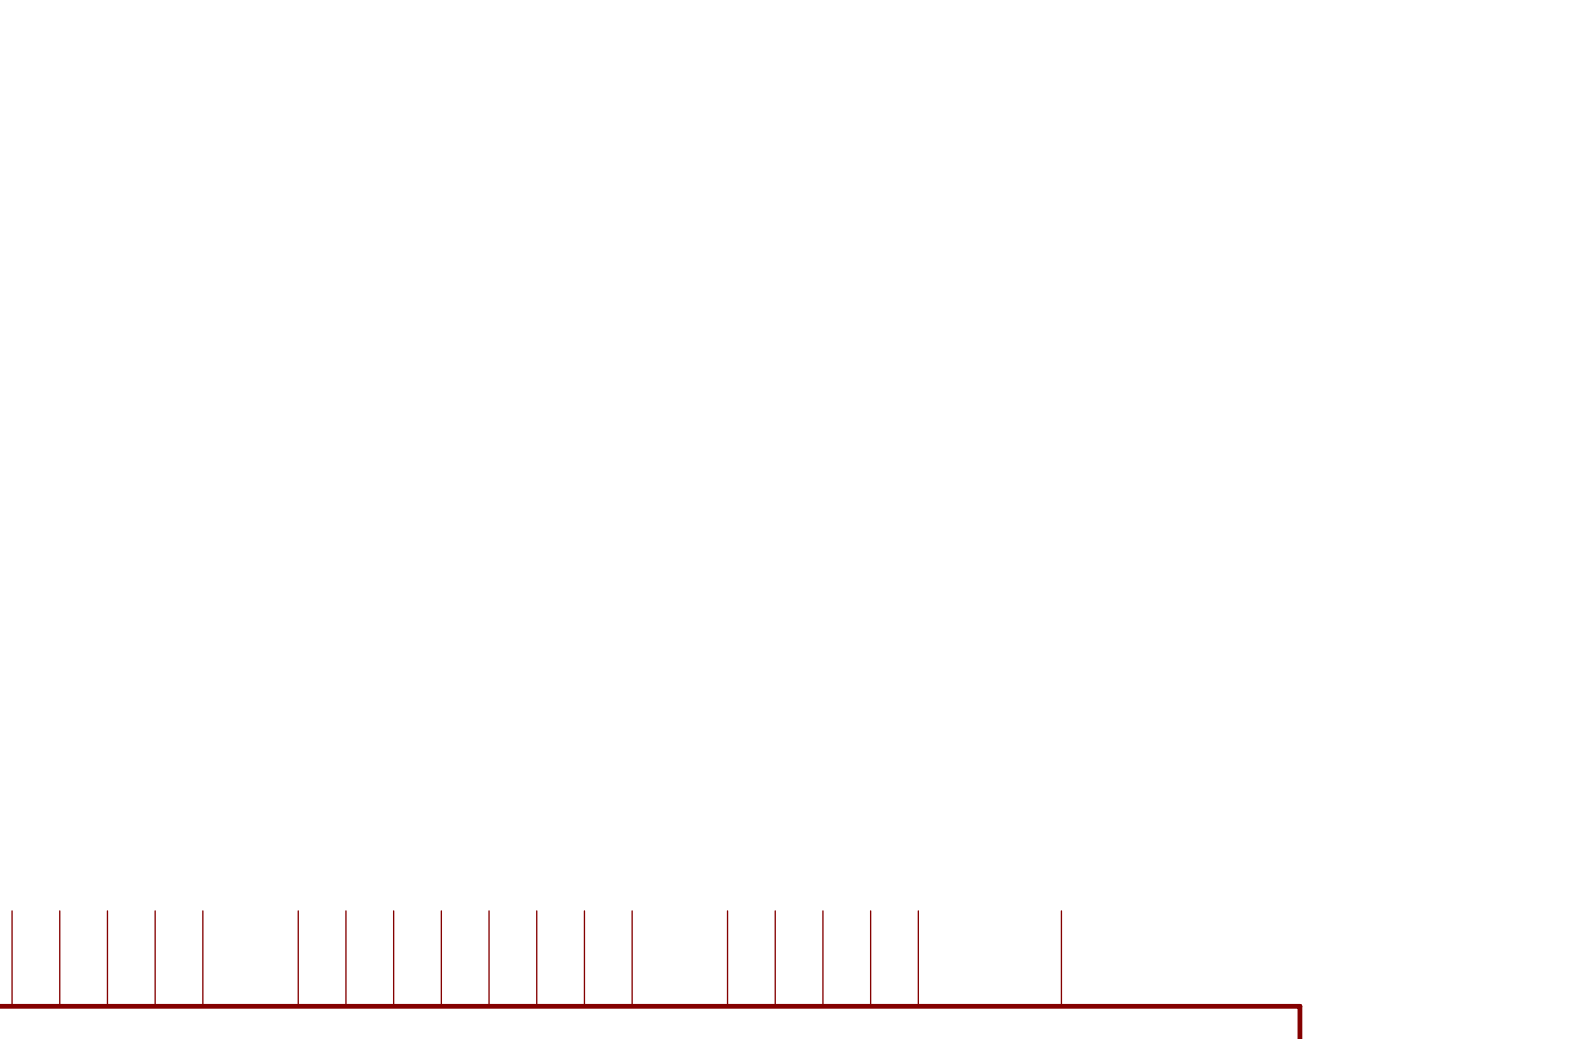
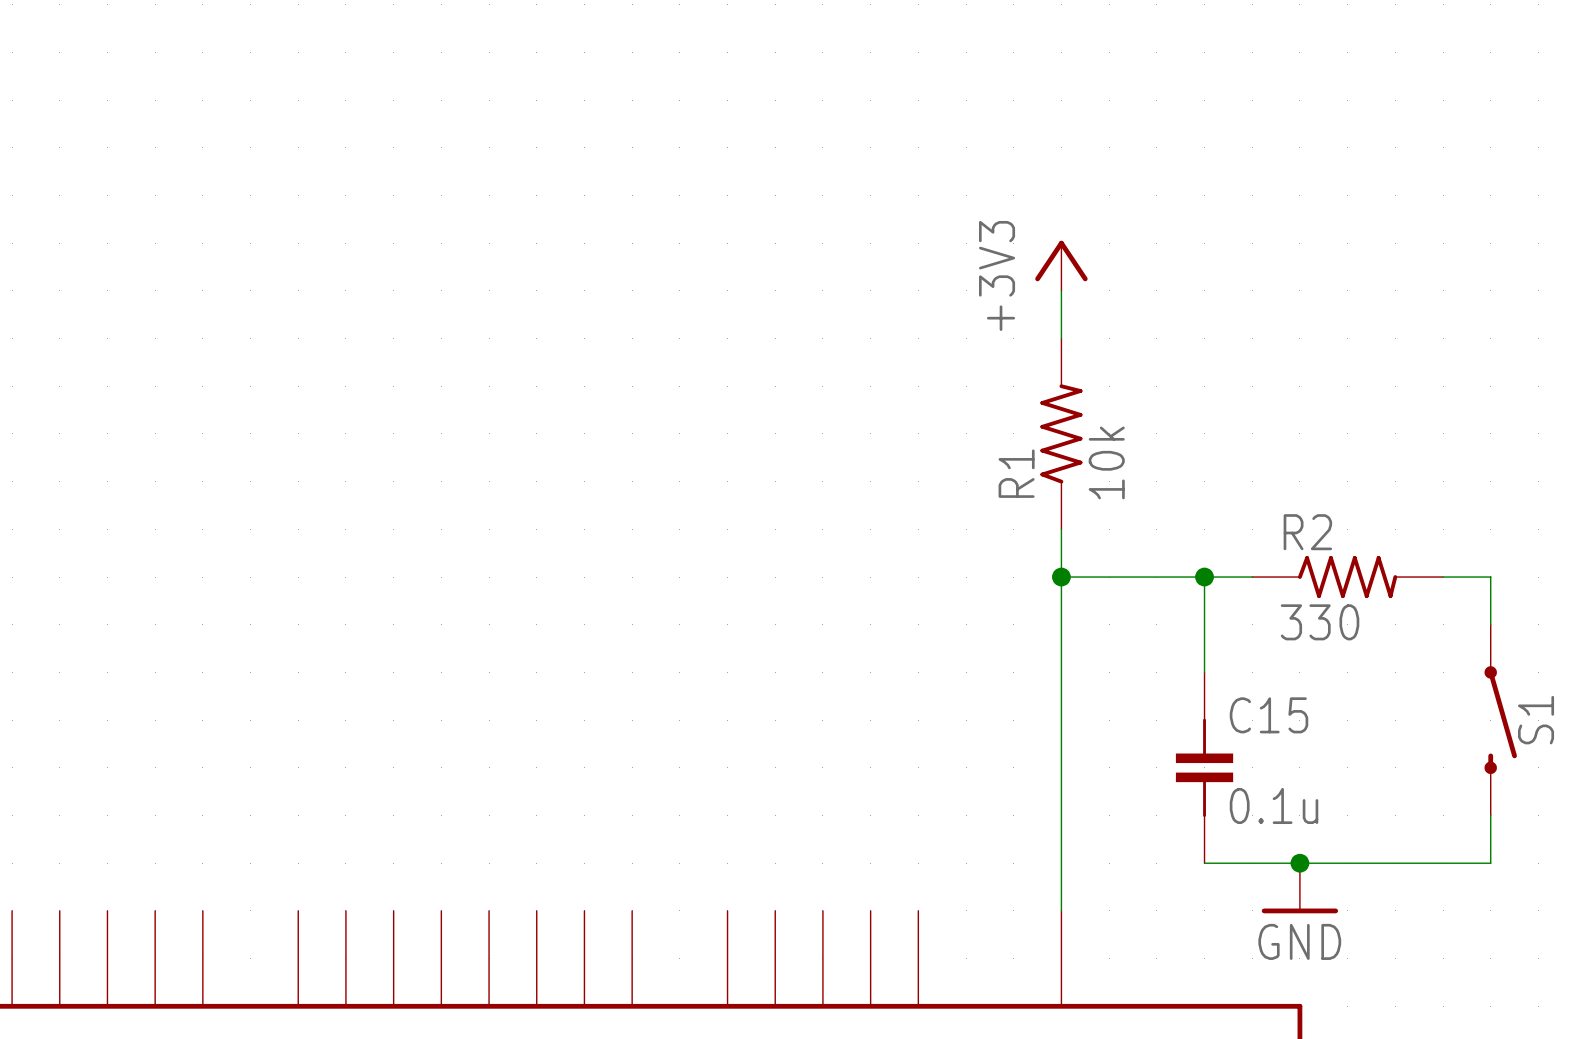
power symbol: none -> +3V3 (1061, 265)
wire: none -> (1061, 290) (1061, 338)
R1: none -> 10k (1061, 433)
wire: none -> (1061, 529) (1061, 910)
wire: none -> (1061, 577) (1252, 577)
junction: none -> (1061, 577)
wire: none -> (1204, 577) (1204, 672)
junction: none -> (1204, 577)
R2: none -> 330 (1347, 577)
wire: none -> (1443, 577) (1490, 577) (1490, 624)
S1: none -> (1500, 720)
C15: none -> 0.1u (1204, 767)
wire: none -> (1490, 815) (1490, 863) (1204, 863)
junction: none -> (1299, 863)
power symbol: none -> GND (1299, 888)

